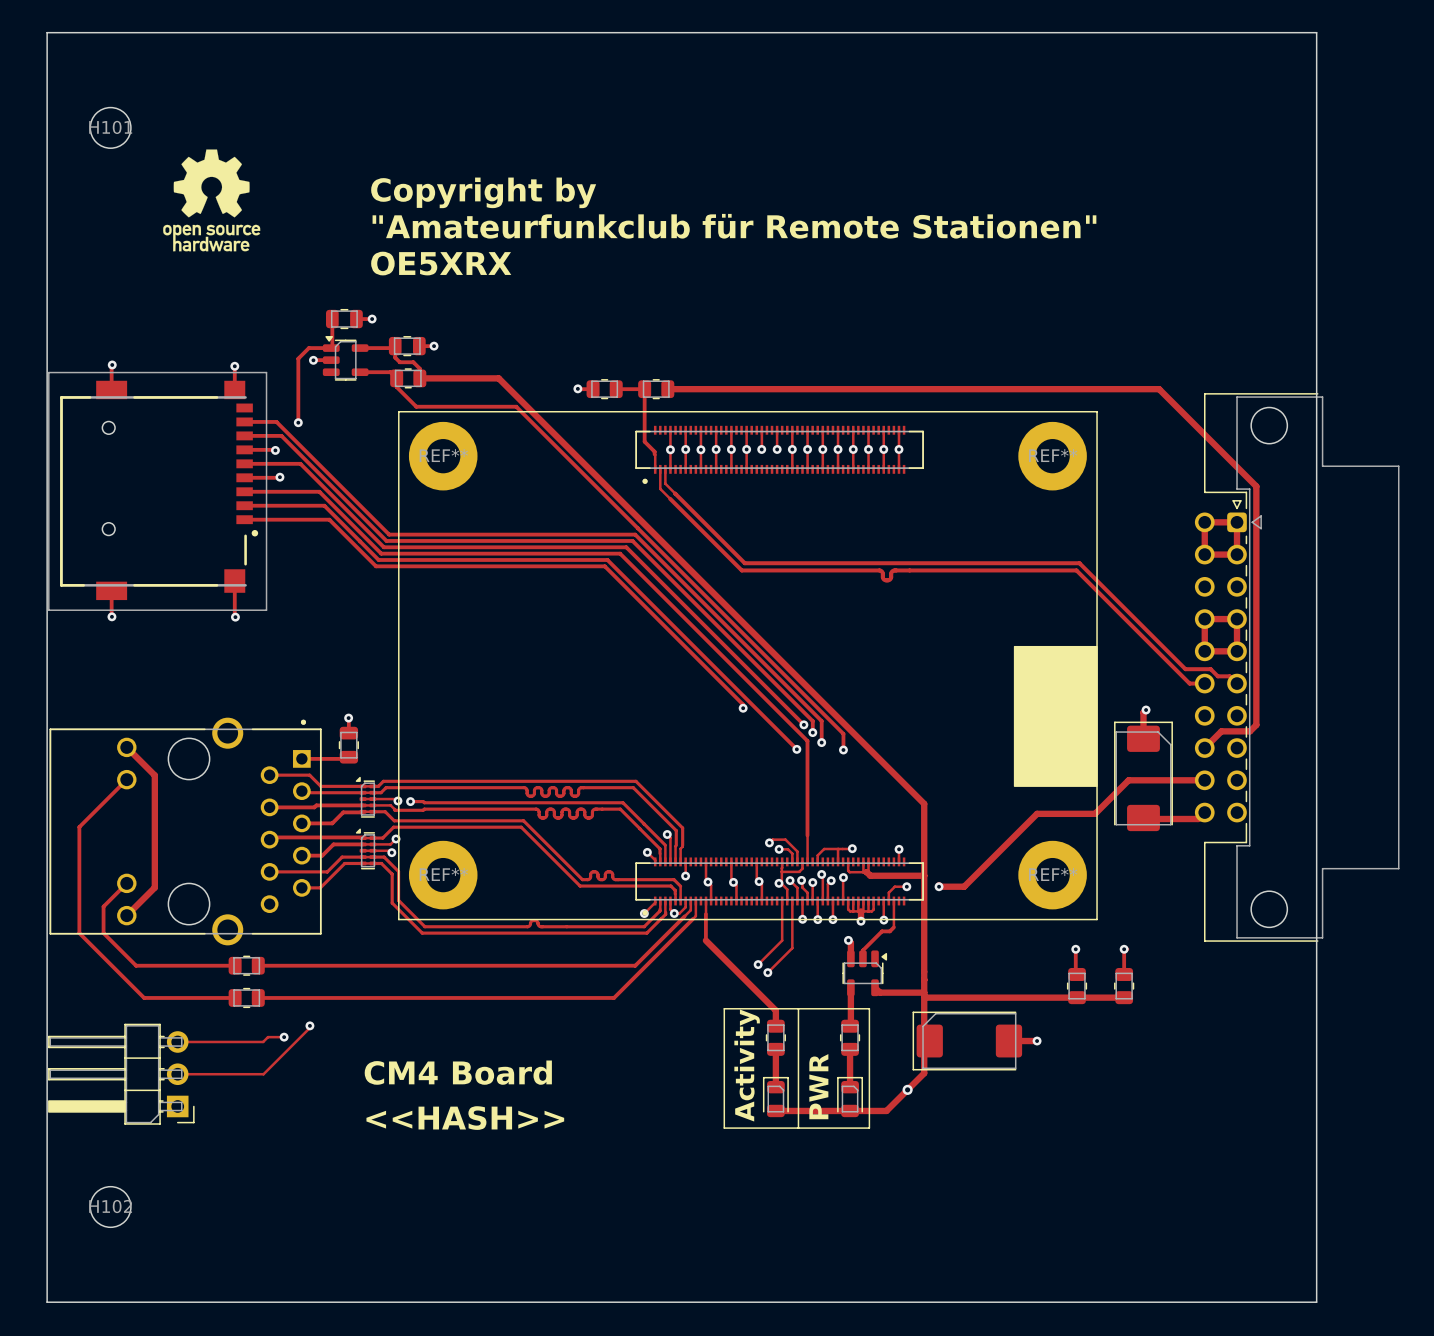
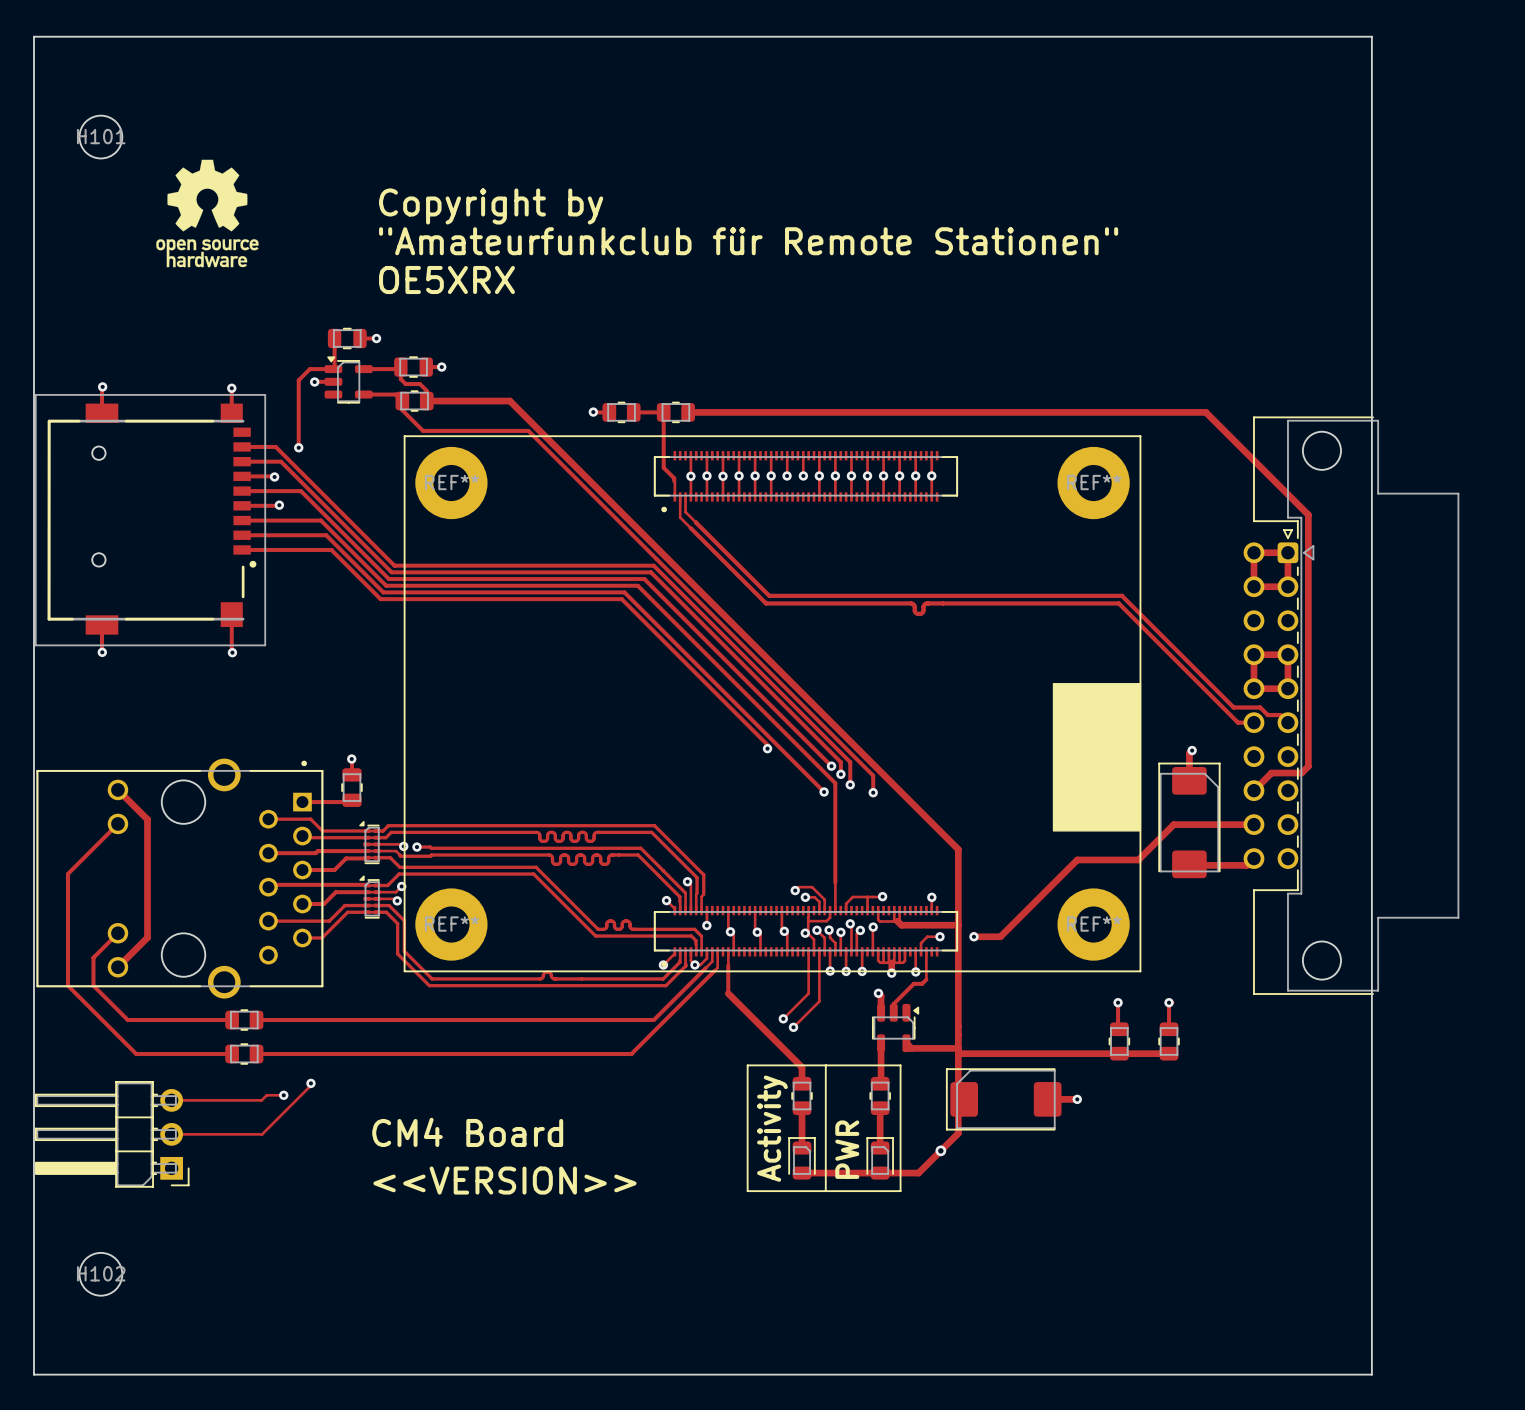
text: <<HASH>> (465, 1118) -> <<VERSION>> (504, 1180)

